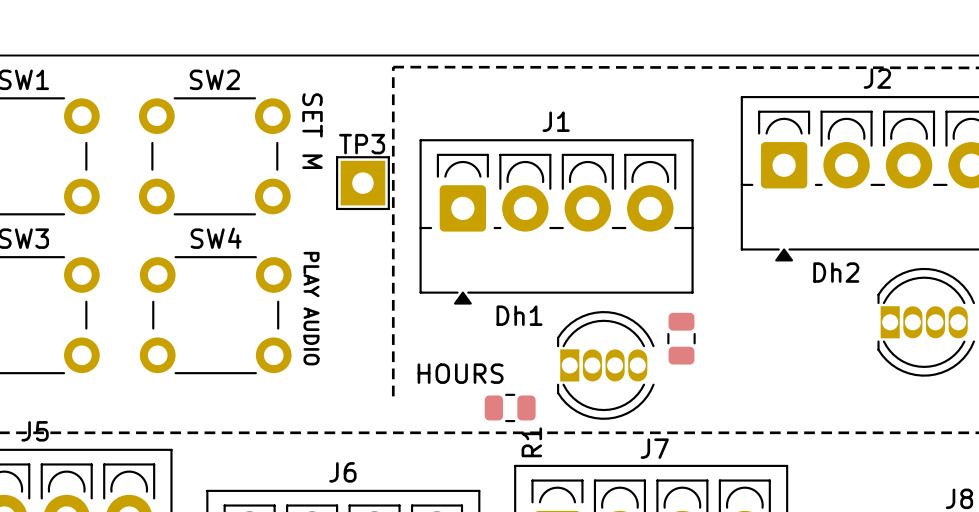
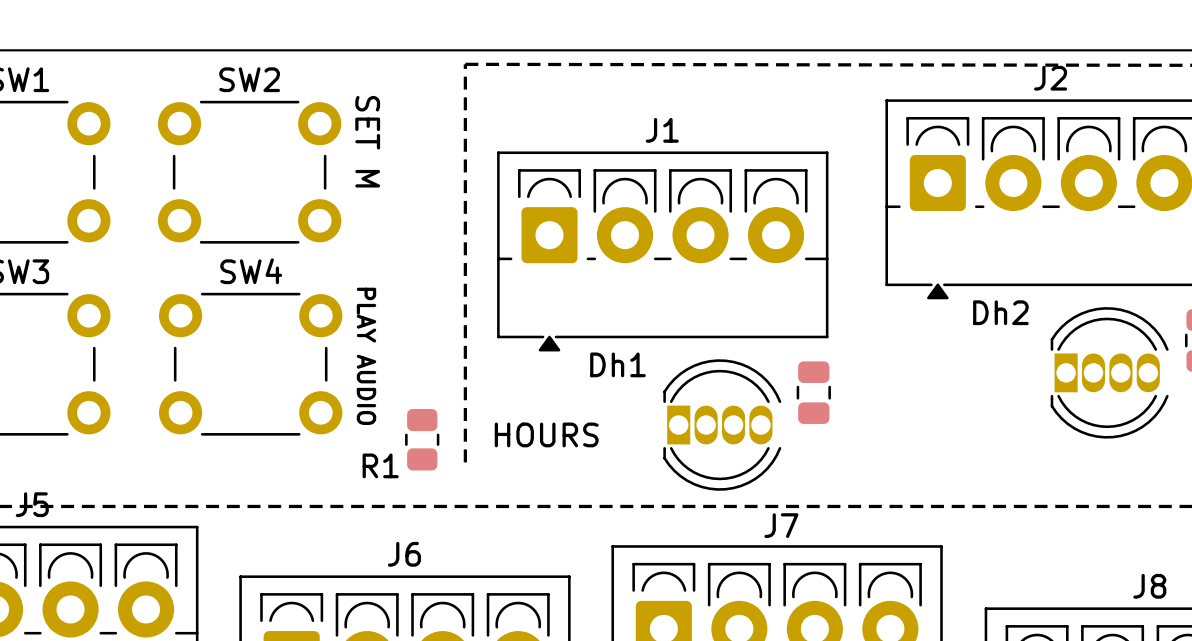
TP3: (362, 183) -> none
R1 rotation: 0° (510, 407) -> 90° clockwise (422, 439)
R1 position: (510, 407) -> (422, 439)

